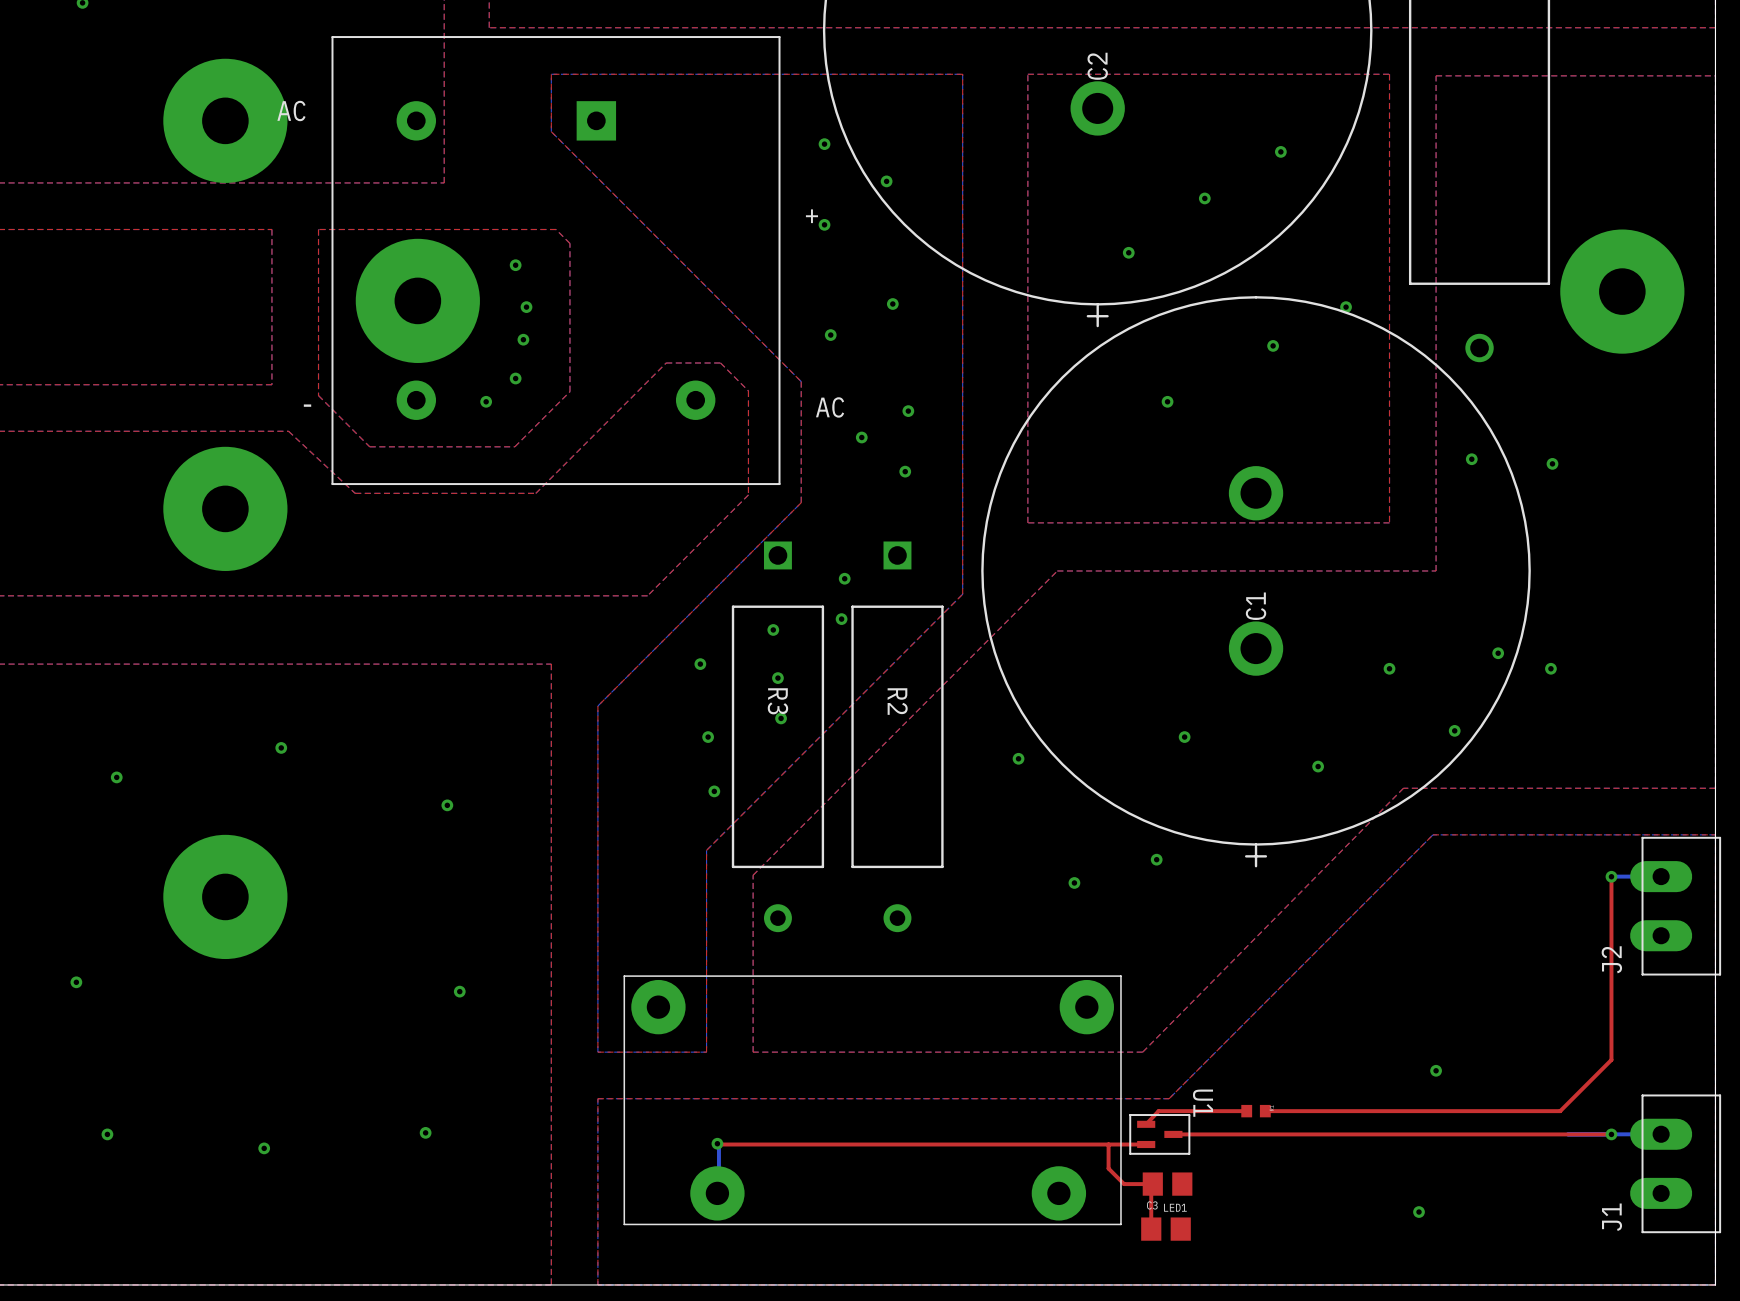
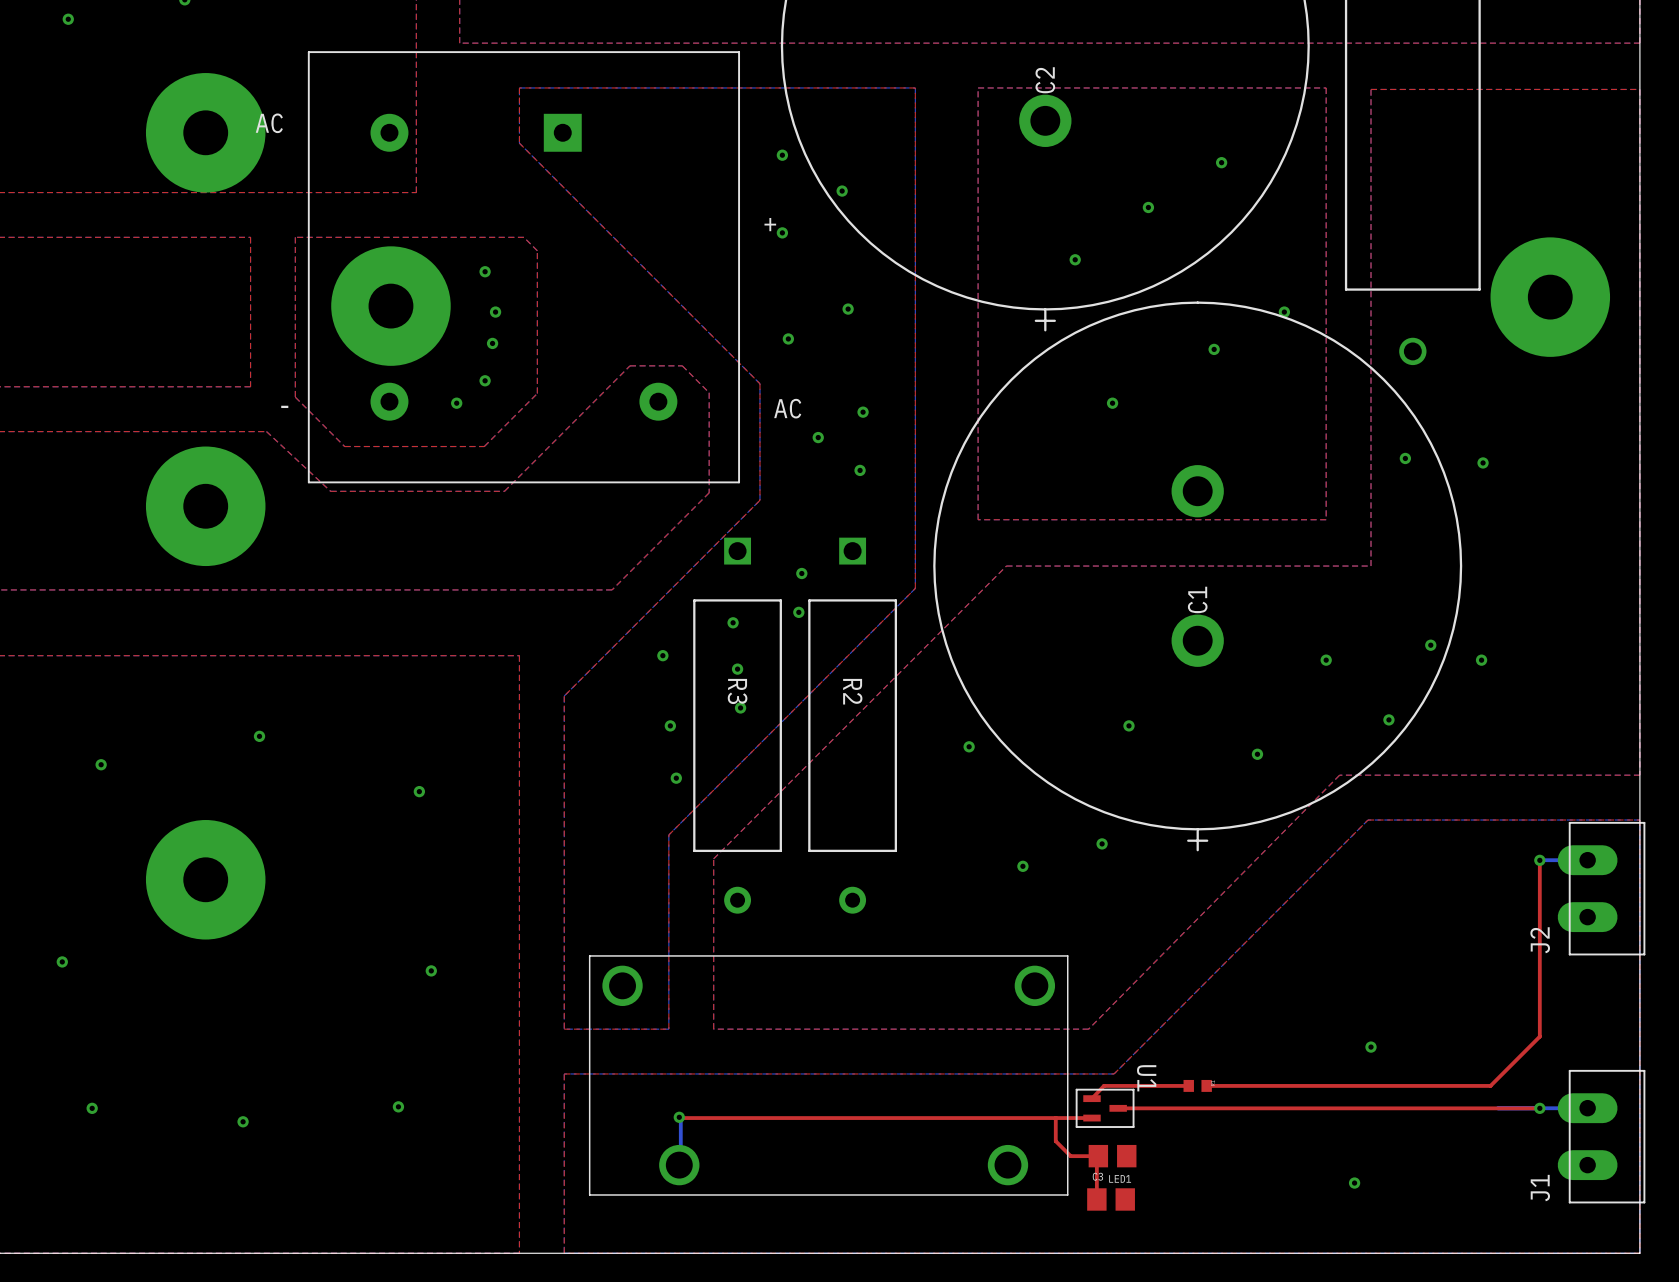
part footprint: [623, 975, 1122, 1226] -> [588, 955, 1069, 1196]

